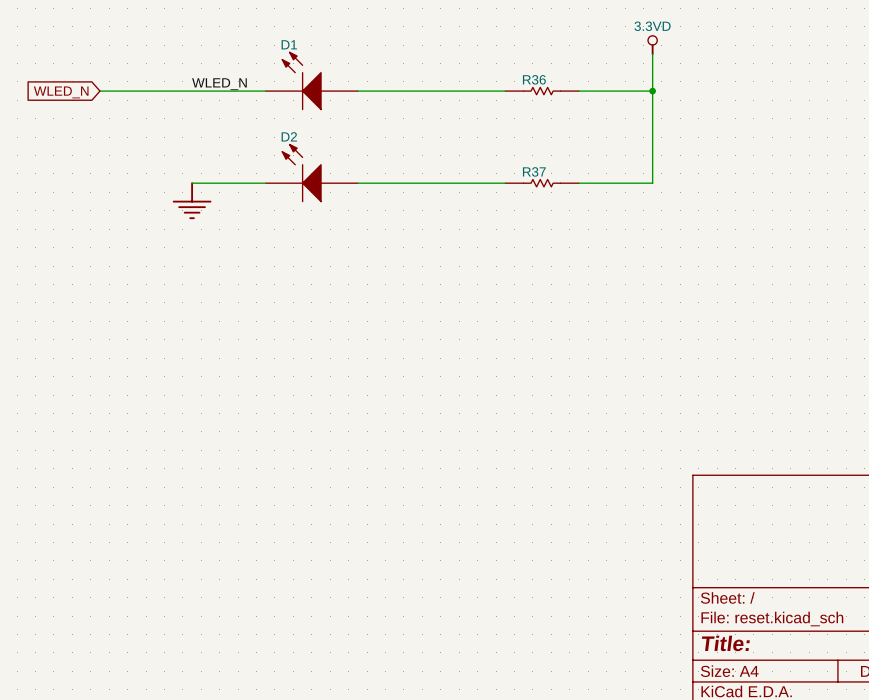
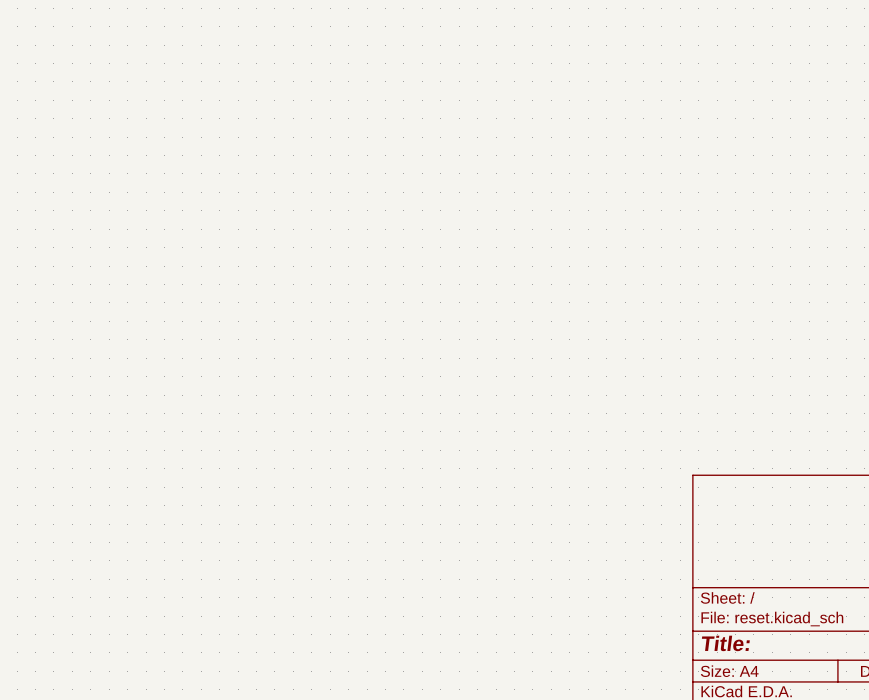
power symbol: 3.3VD (652, 45) -> none
wire: (652, 54) (652, 183) (578, 183) -> none
D1: (311, 80) -> none
label: WLED_N (219, 84) -> none
wire: (99, 91) (265, 91) -> none
wire: (357, 91) (505, 91) -> none
R36: (542, 91) -> none
wire: (578, 91) (652, 91) -> none
junction: (652, 91) -> none
global label: WLED_N (61, 92) -> none
D2: (311, 173) -> none
wire: (192, 183) (265, 183) -> none
wire: (357, 183) (505, 183) -> none
R37: (542, 183) -> none
power symbol: (192, 200) -> none

